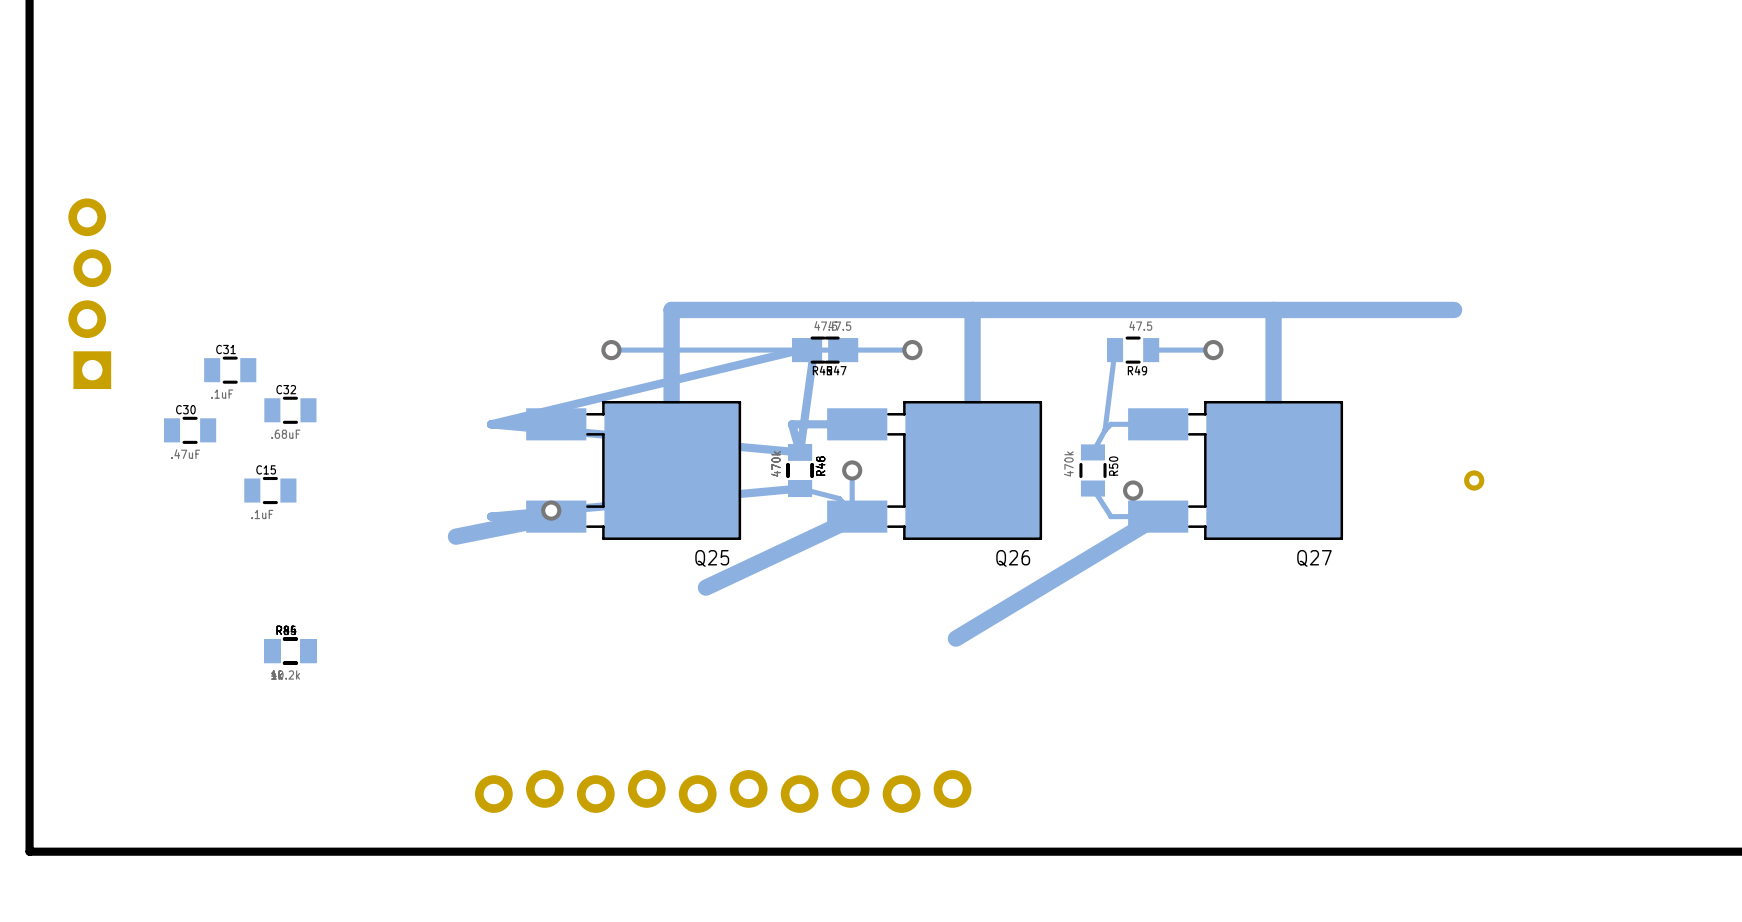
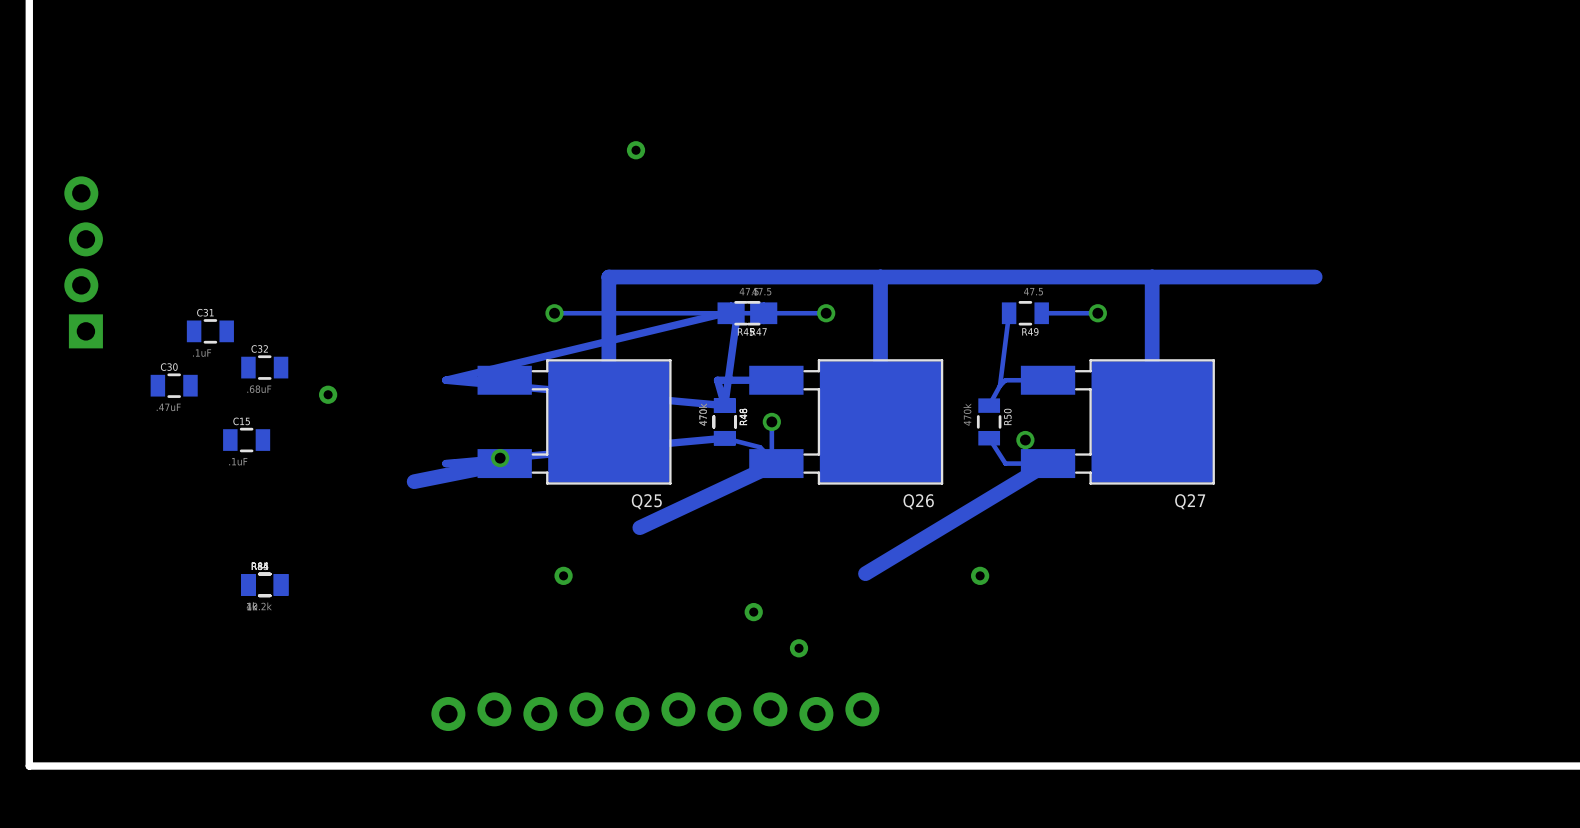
part: none -> (636, 150)
part: none -> (328, 394)
part: (1474, 480) -> none
part: none -> (563, 575)
part: none -> (980, 575)
part: none -> (753, 612)
part: none -> (799, 648)

